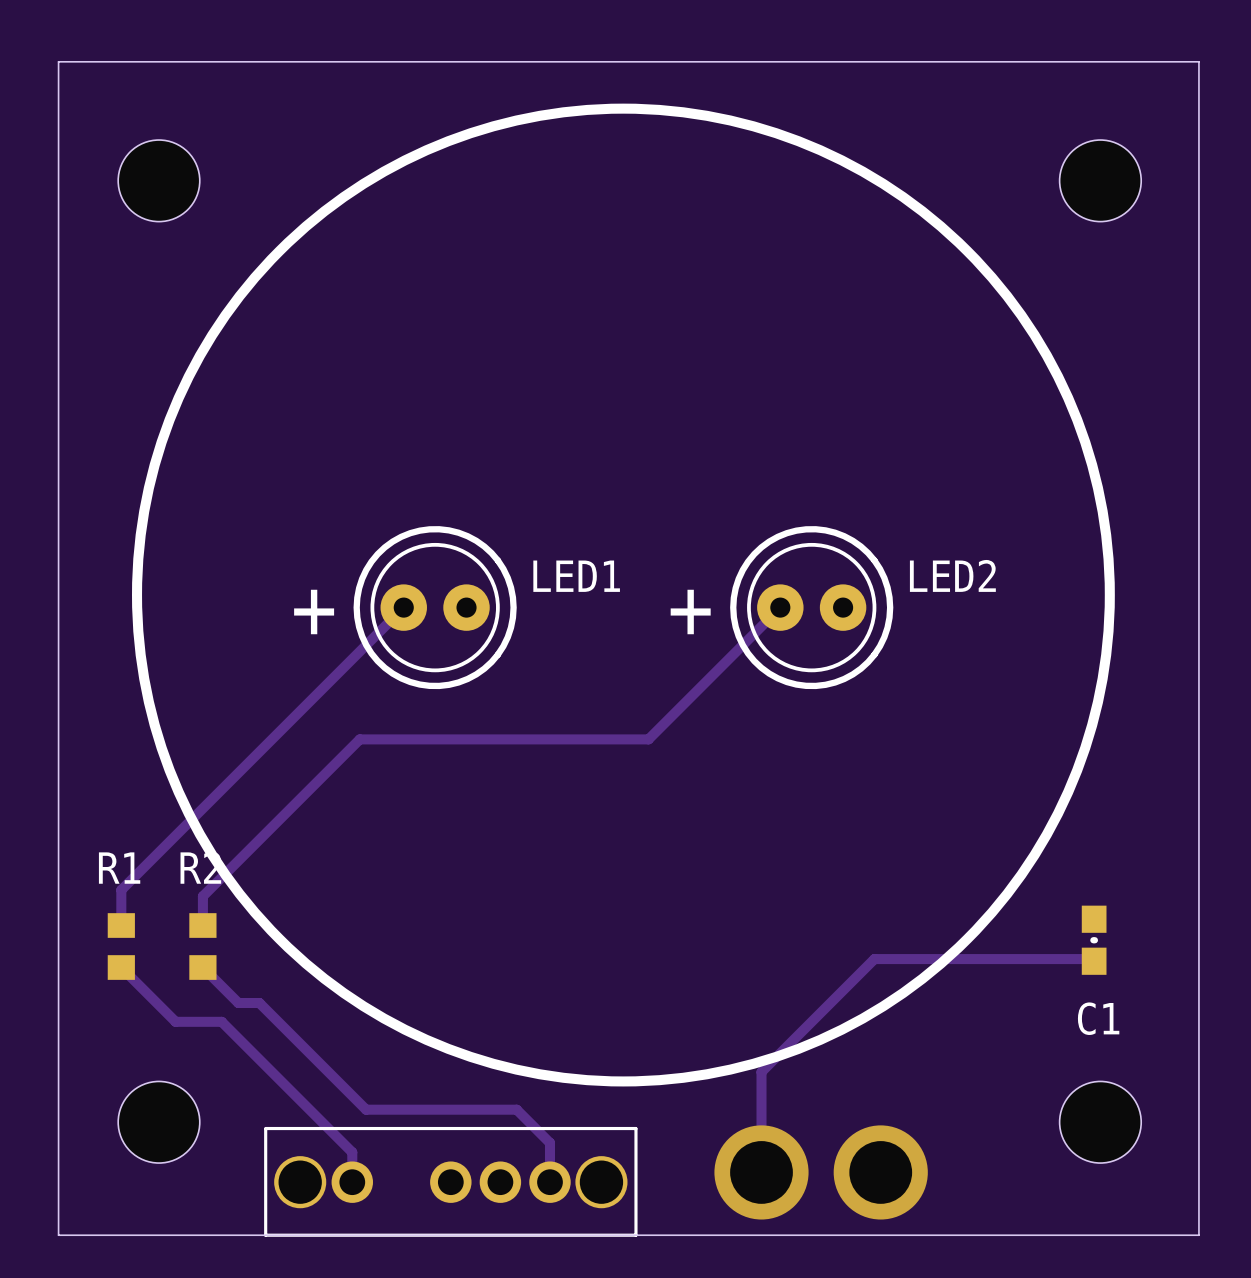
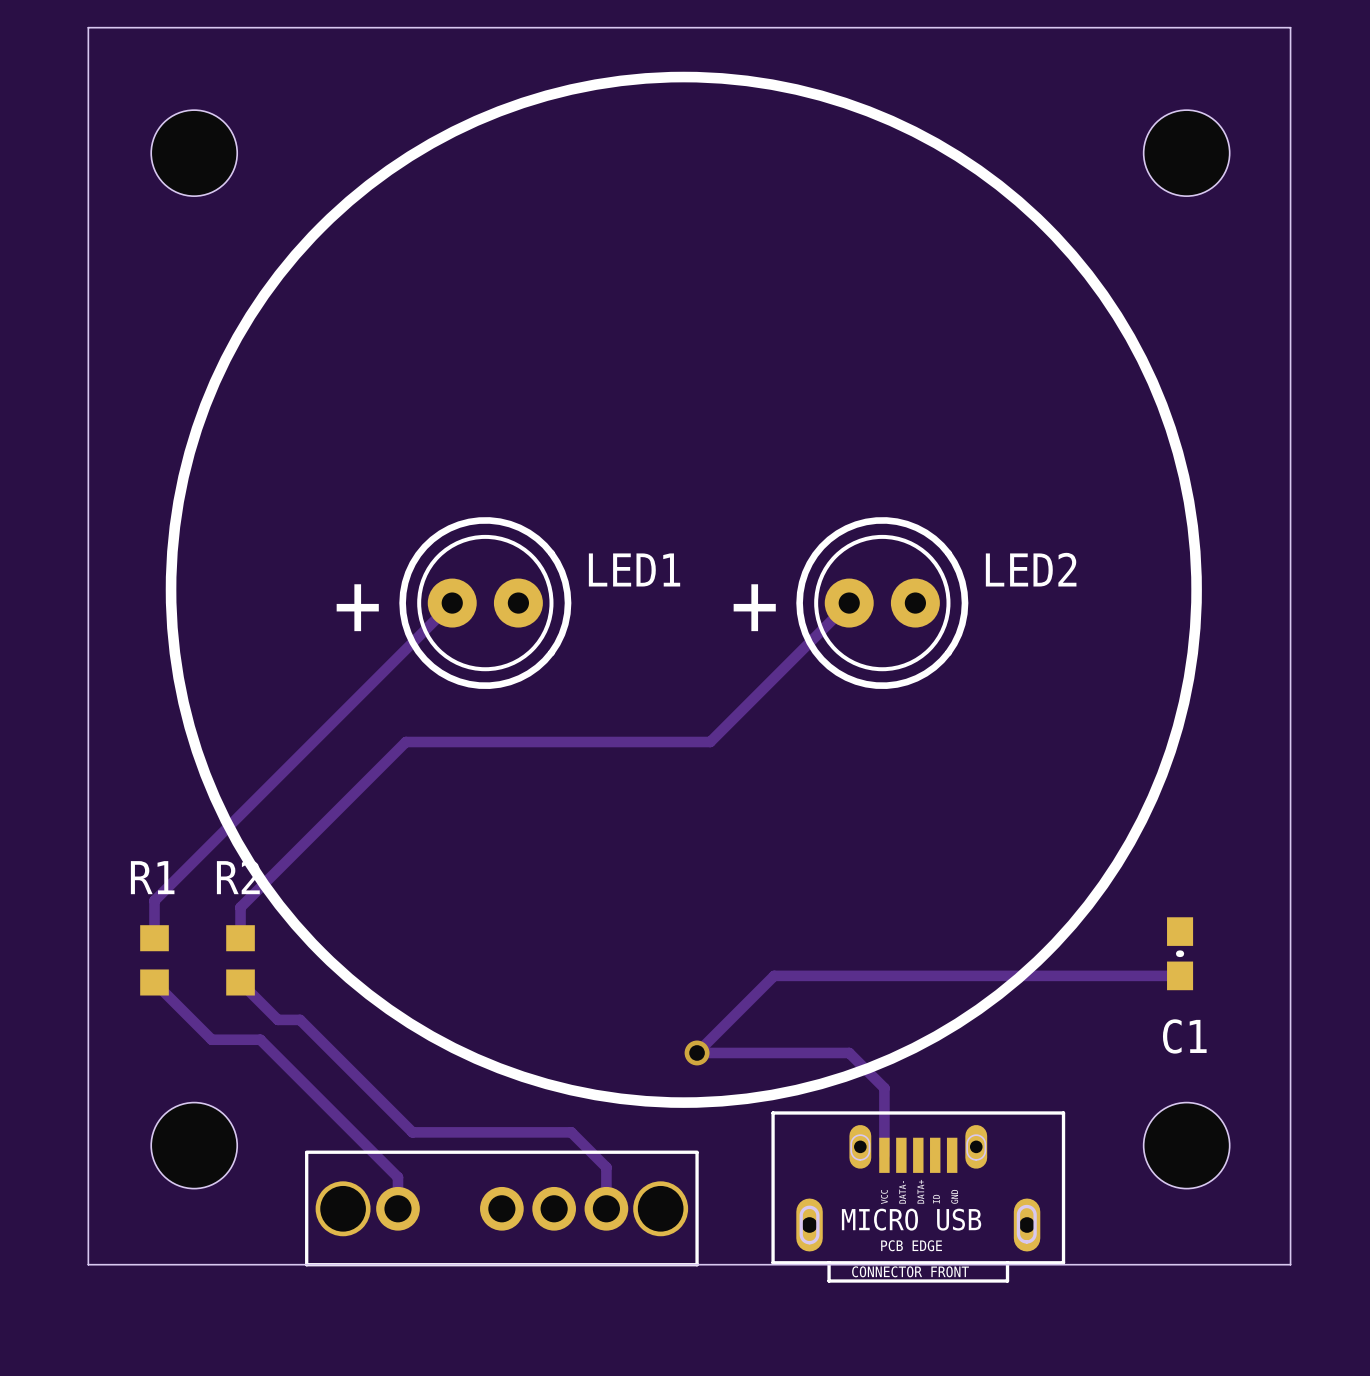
track: (1094, 961) (1091, 959) (874, 959) (761, 1072) (761, 1172) -> (1180, 975) (774, 975) (697, 1052) (849, 1052) (884, 1088) (884, 1155)
via: none -> (697, 1052)
part: none -> (918, 1197)
via: (761, 1172) -> none
via: (880, 1172) -> none

